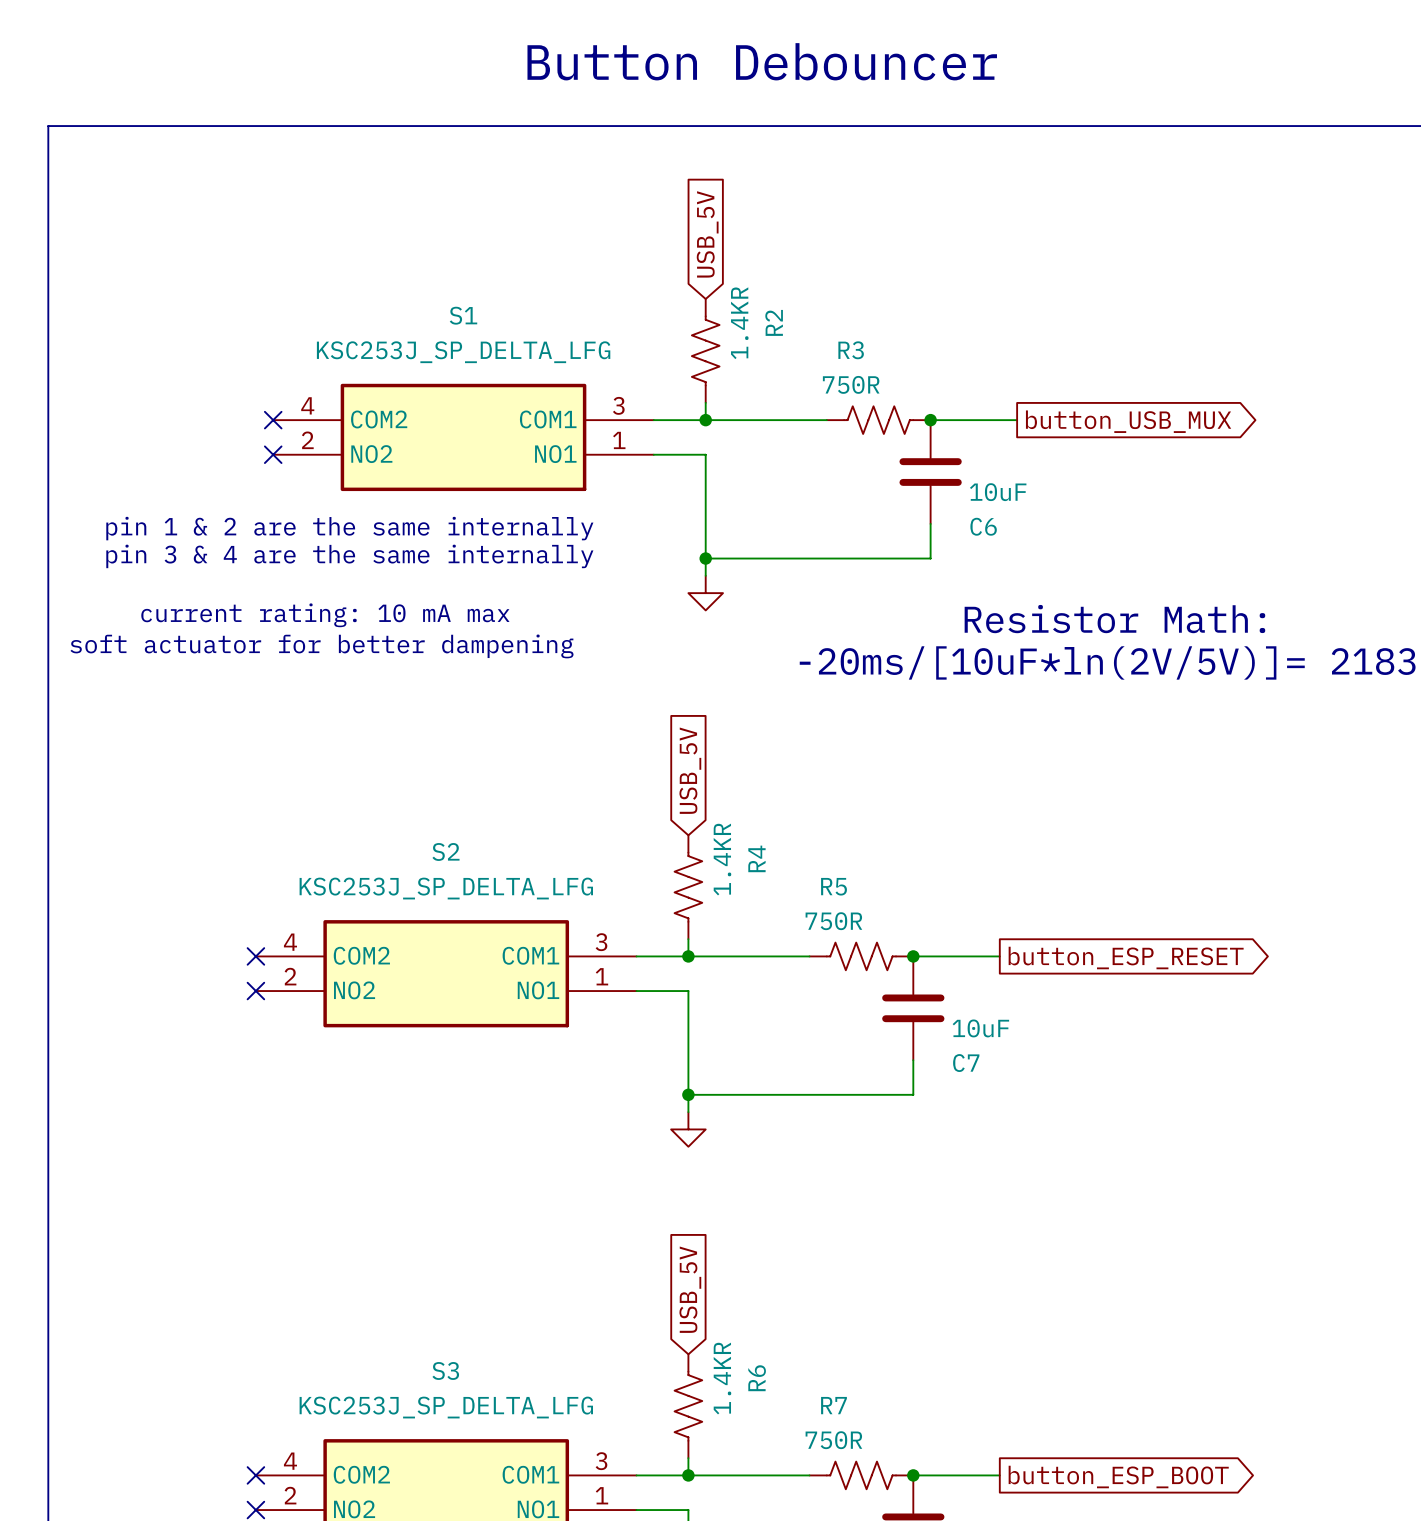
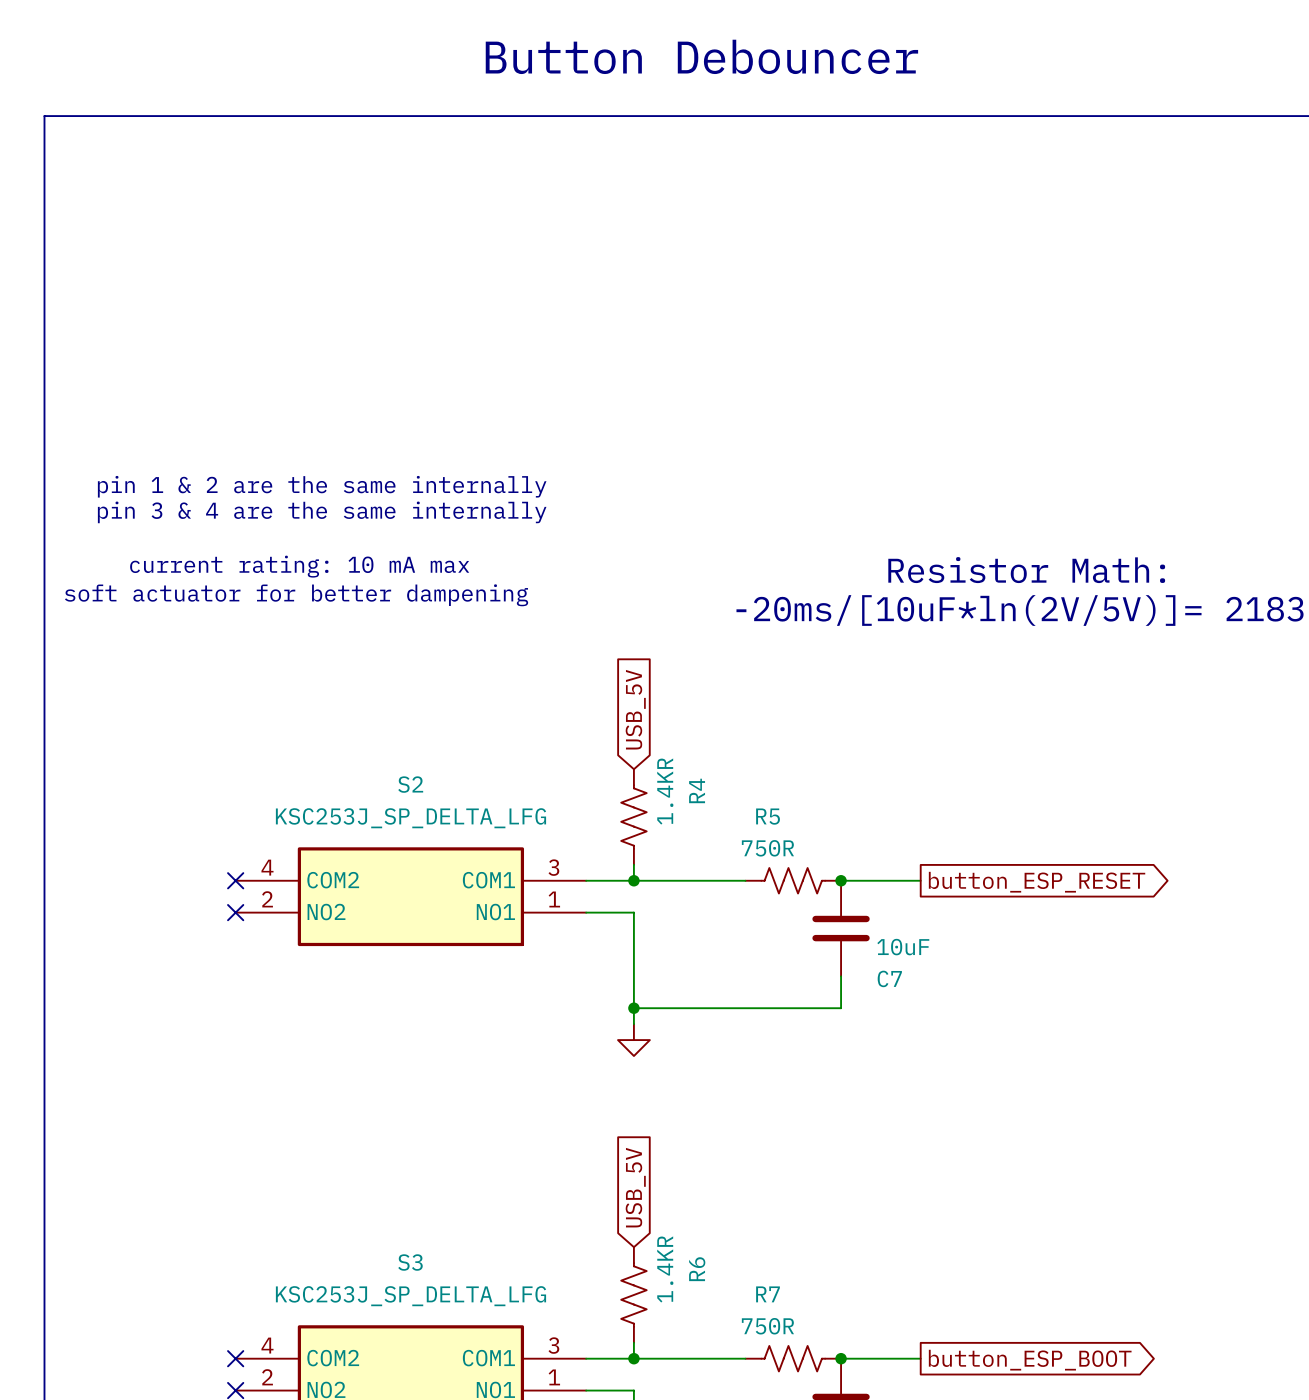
global label: USB_5V (707, 234) -> none
R2: 1.4KR (705, 350) -> none
wire: (705, 402) (705, 420) -> none
no-connect mark: (273, 420) -> none
wire: (653, 420) (826, 420) -> none
junction: (705, 420) -> none
R3: 750R (878, 420) -> none
wire: (930, 420) (1017, 420) -> none
junction: (930, 420) -> none
global label: button_USB_MUX (1128, 421) -> none
S1: KSC253J_SP_DELTA_LFG (463, 437) -> none
no-connect mark: (273, 454) -> none
wire: (653, 454) (705, 454) (705, 575) -> none
C6: 10uF (930, 472) -> none
wire: (930, 523) (930, 558) (705, 558) -> none
junction: (705, 558) -> none
power symbol: (705, 593) -> none

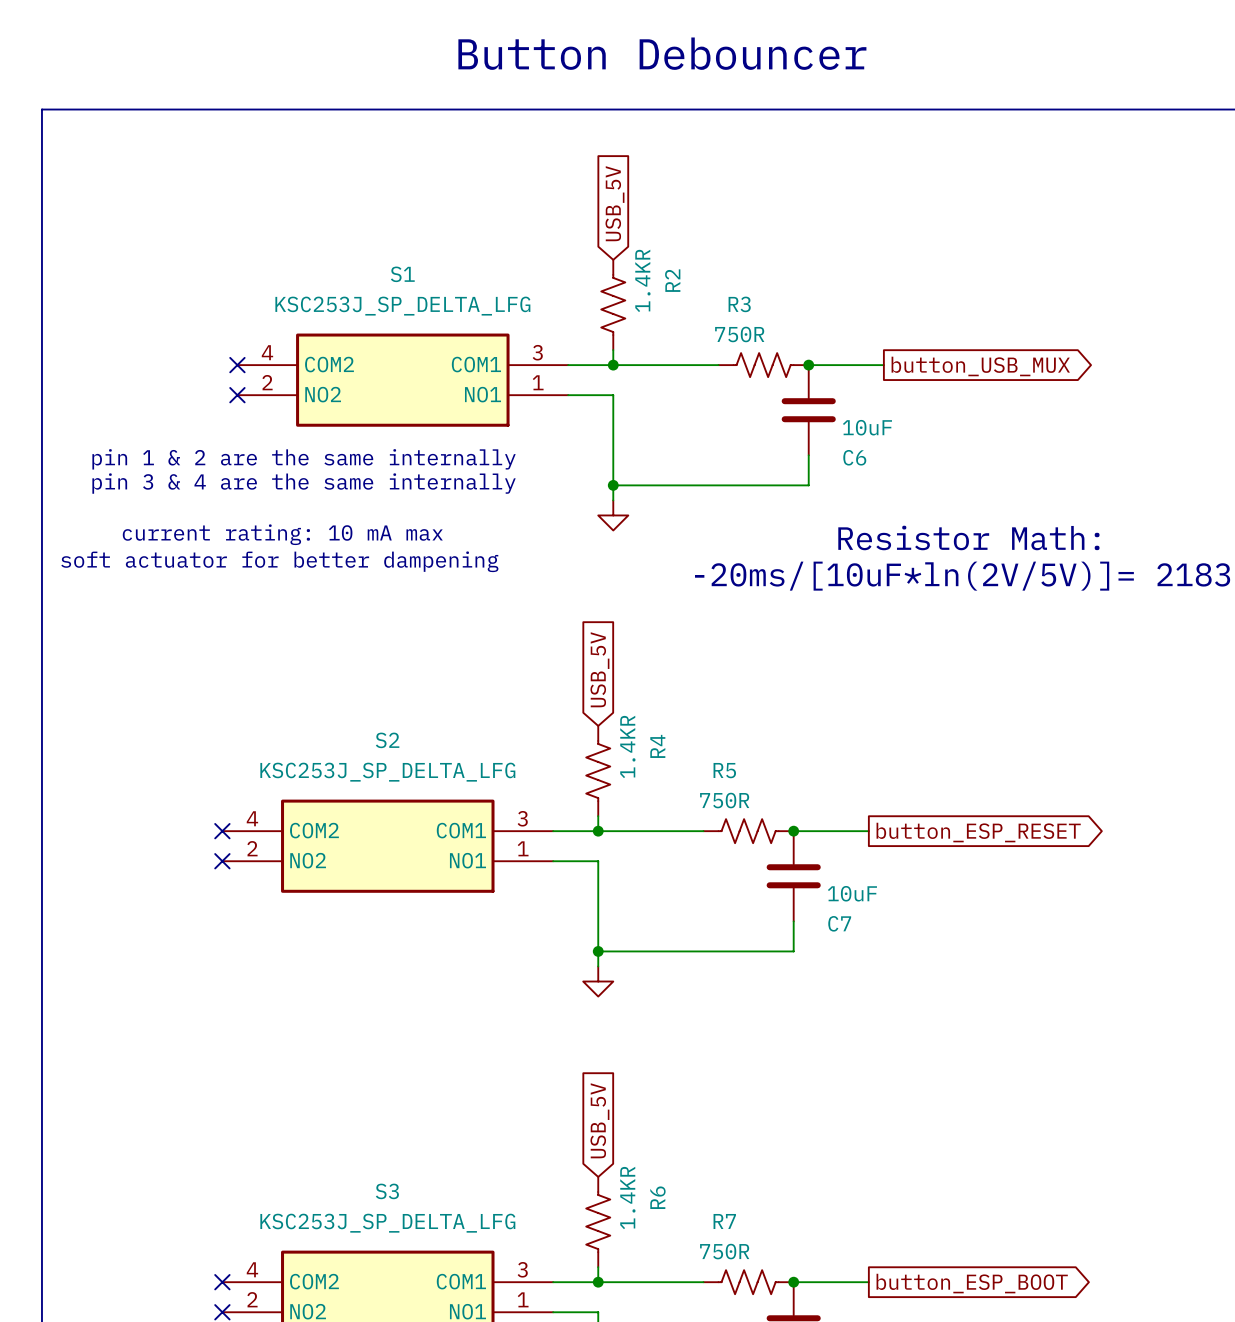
global label: none -> USB_5V (614, 203)
R2: none -> 1.4KR (613, 304)
wire: none -> (613, 350) (613, 365)
no-connect mark: none -> (237, 365)
wire: none -> (568, 365) (718, 365)
junction: none -> (613, 365)
R3: none -> 750R (763, 365)
wire: none -> (808, 365) (883, 365)
junction: none -> (808, 365)
global label: none -> button_USB_MUX (980, 366)
S1: none -> KSC253J_SP_DELTA_LFG (402, 380)
no-connect mark: none -> (237, 395)
wire: none -> (568, 395) (613, 395) (613, 500)
C6: none -> 10uF (808, 410)
wire: none -> (808, 455) (808, 485) (613, 485)
junction: none -> (613, 485)
power symbol: none -> (613, 515)

